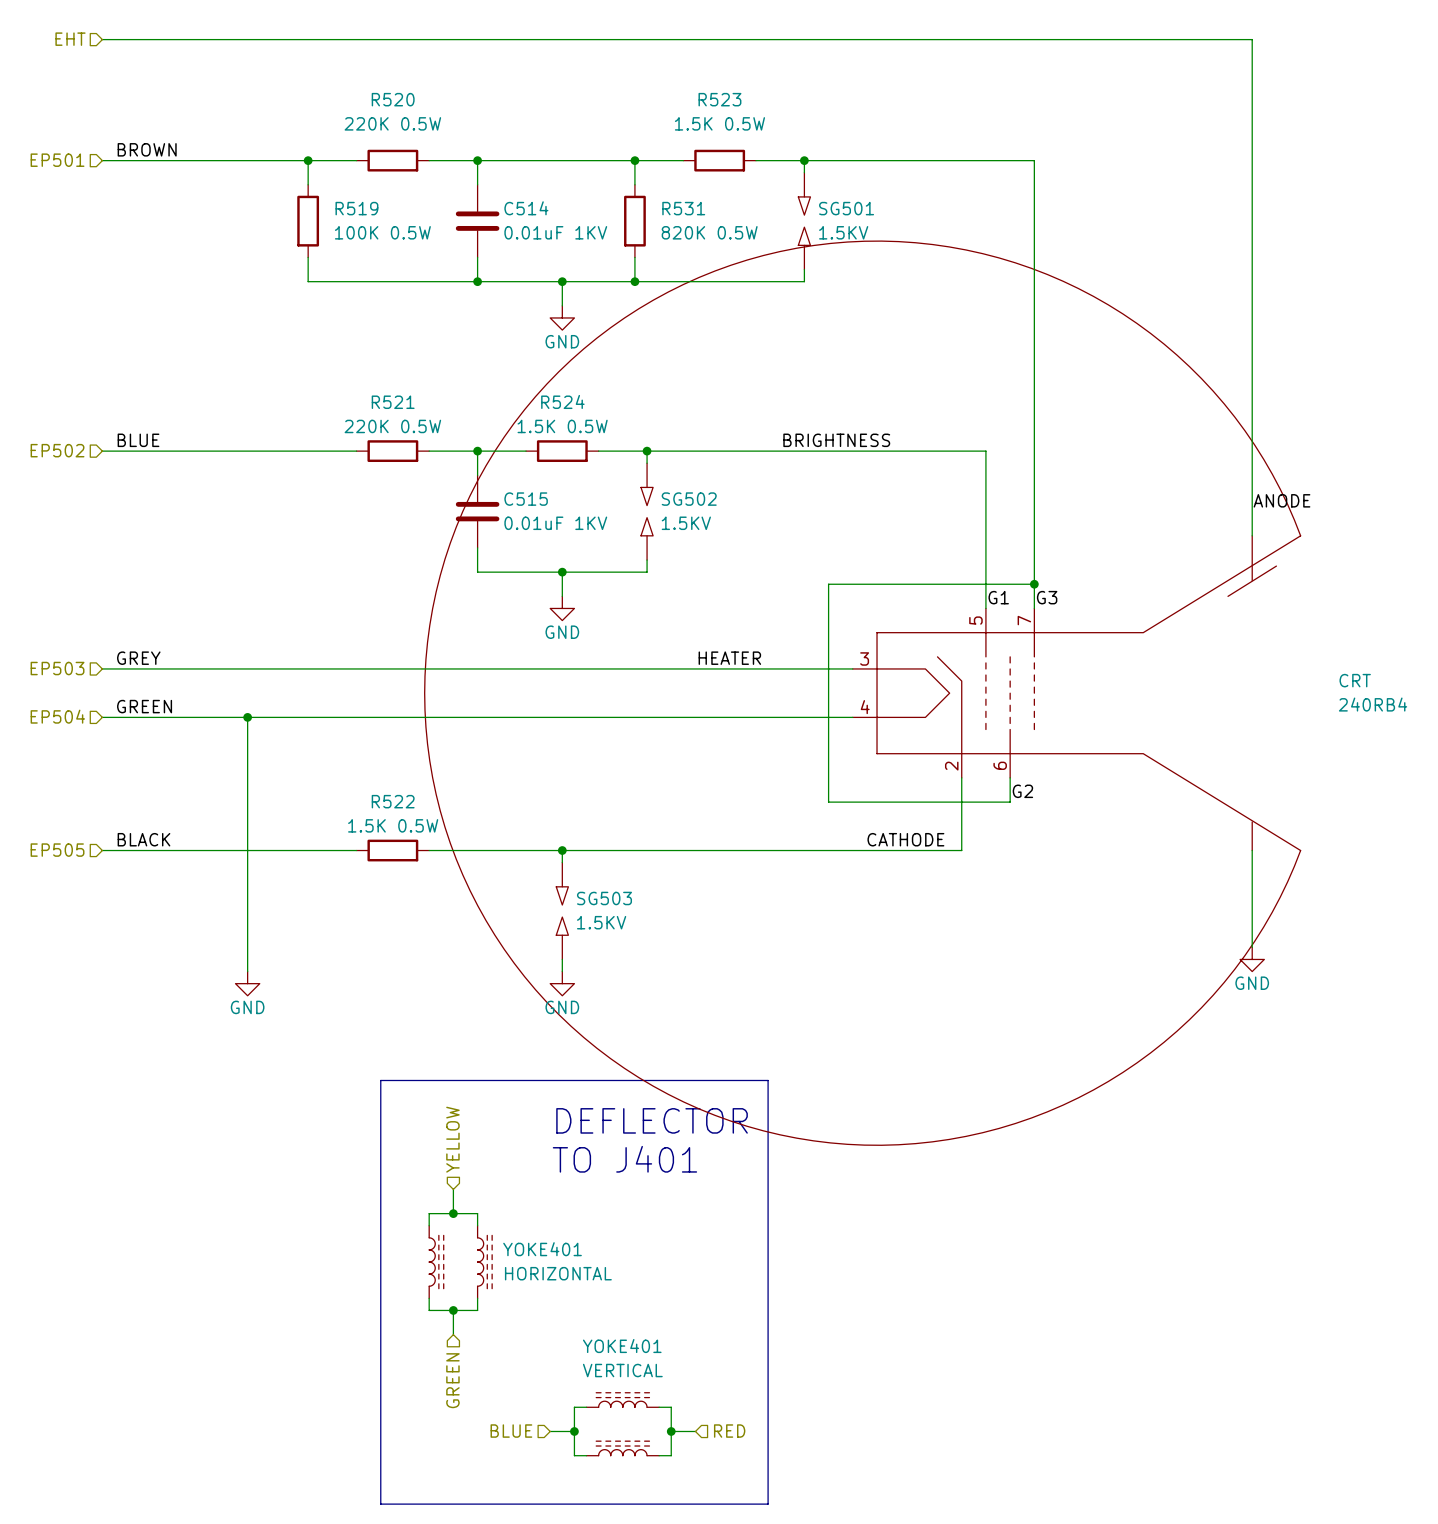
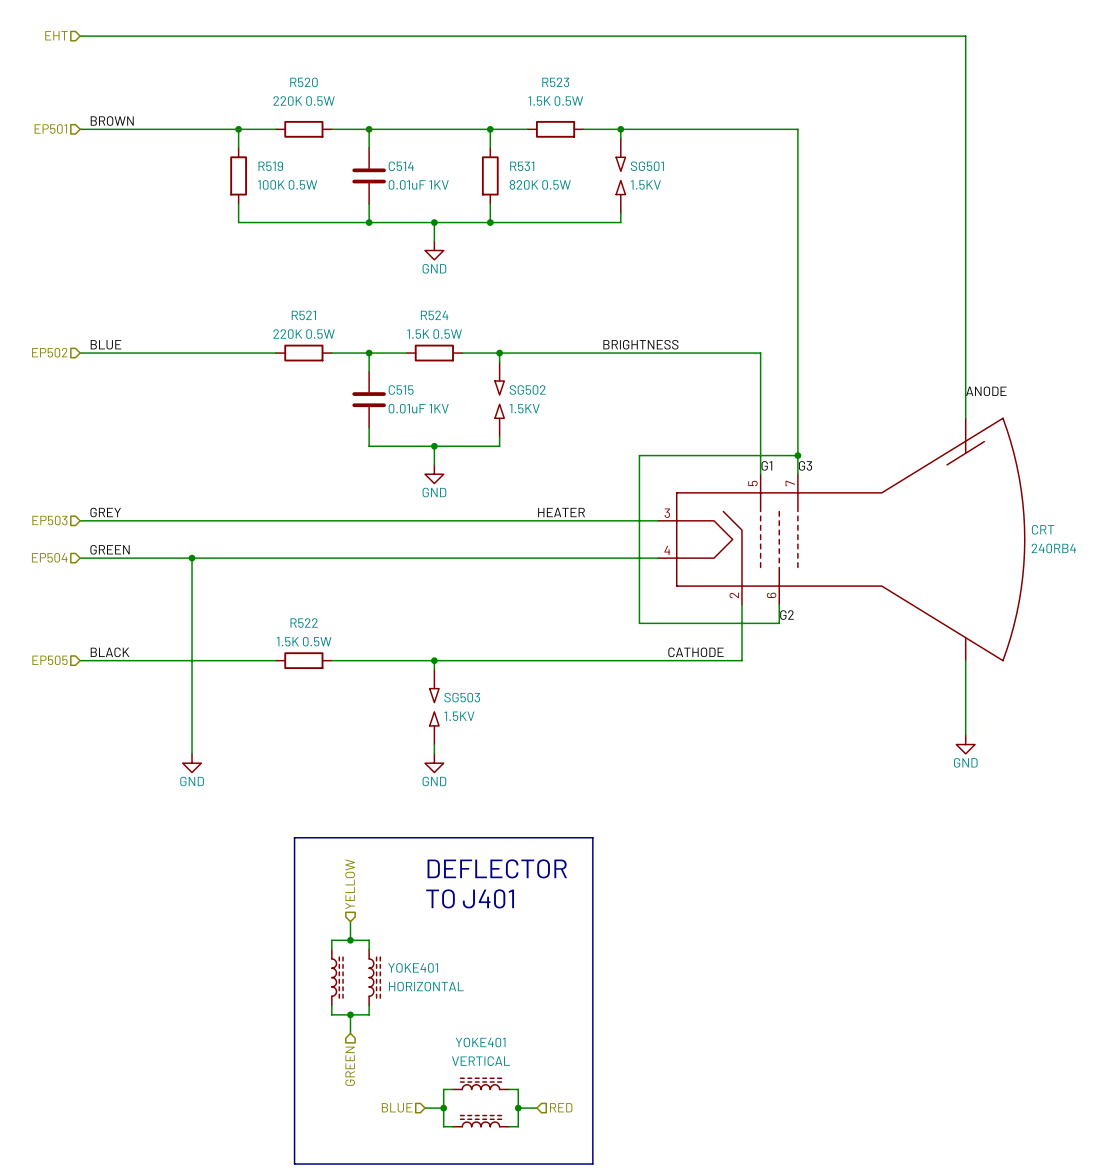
CRT: 240RB4 (862, 693) -> none
CRT: none -> 240RB4 (841, 539)

